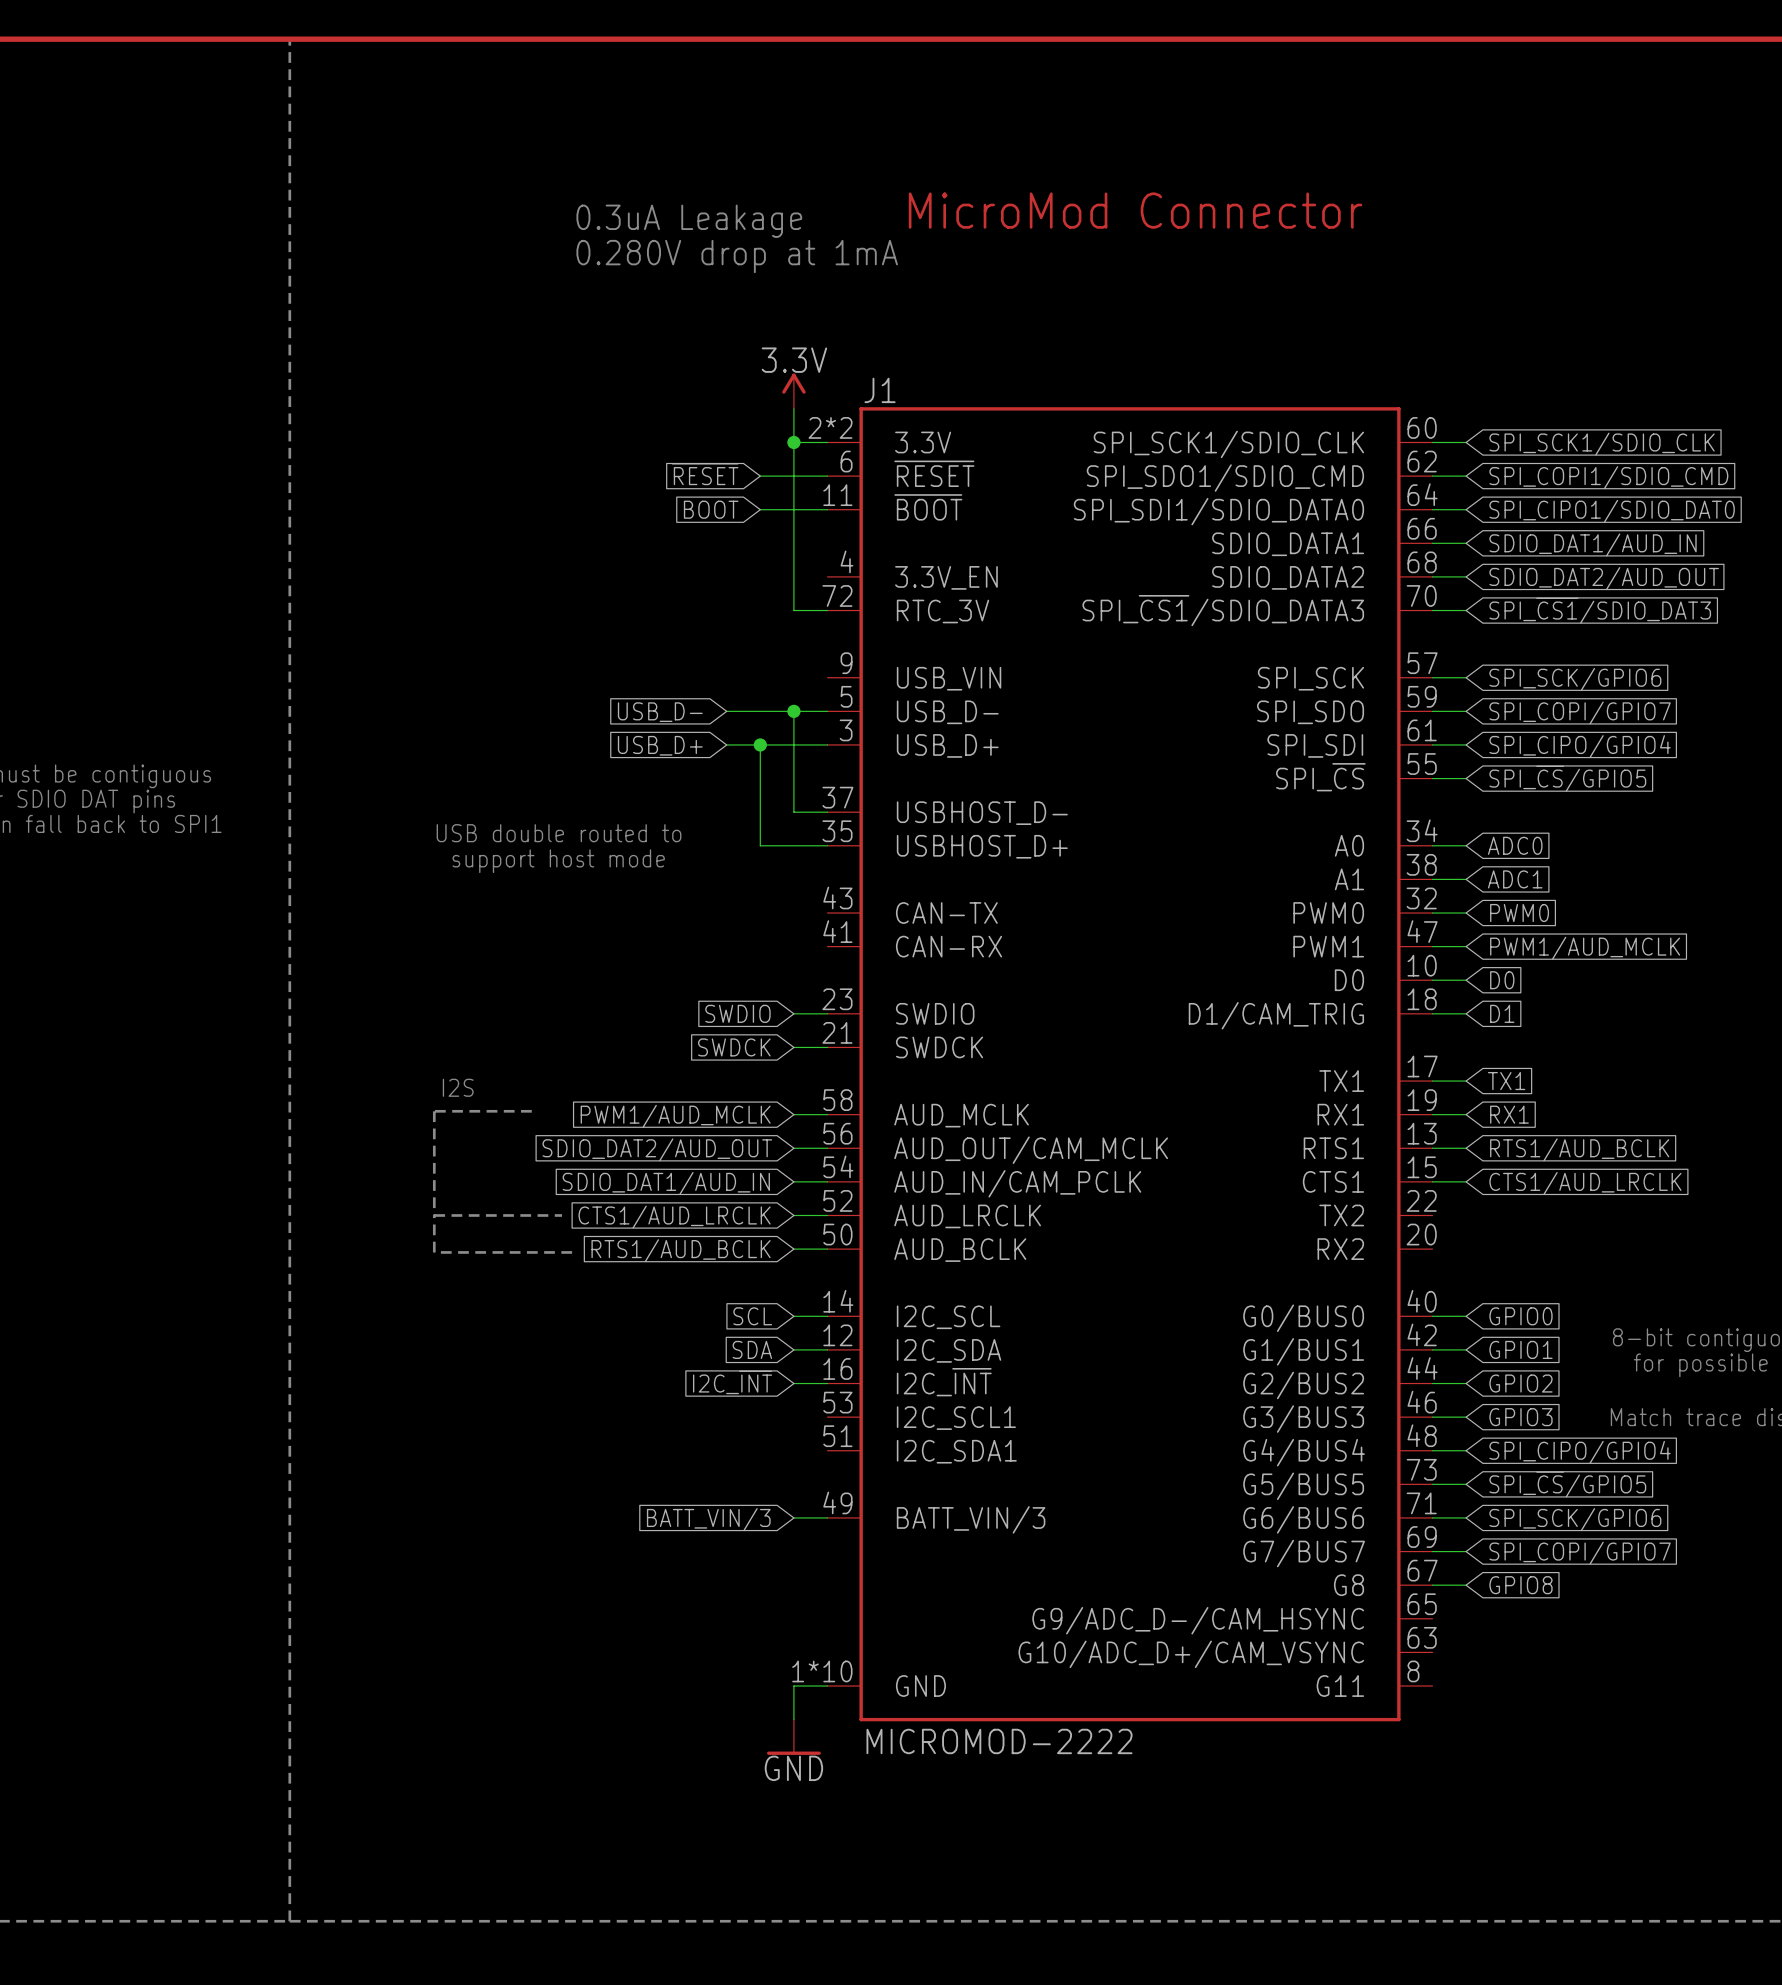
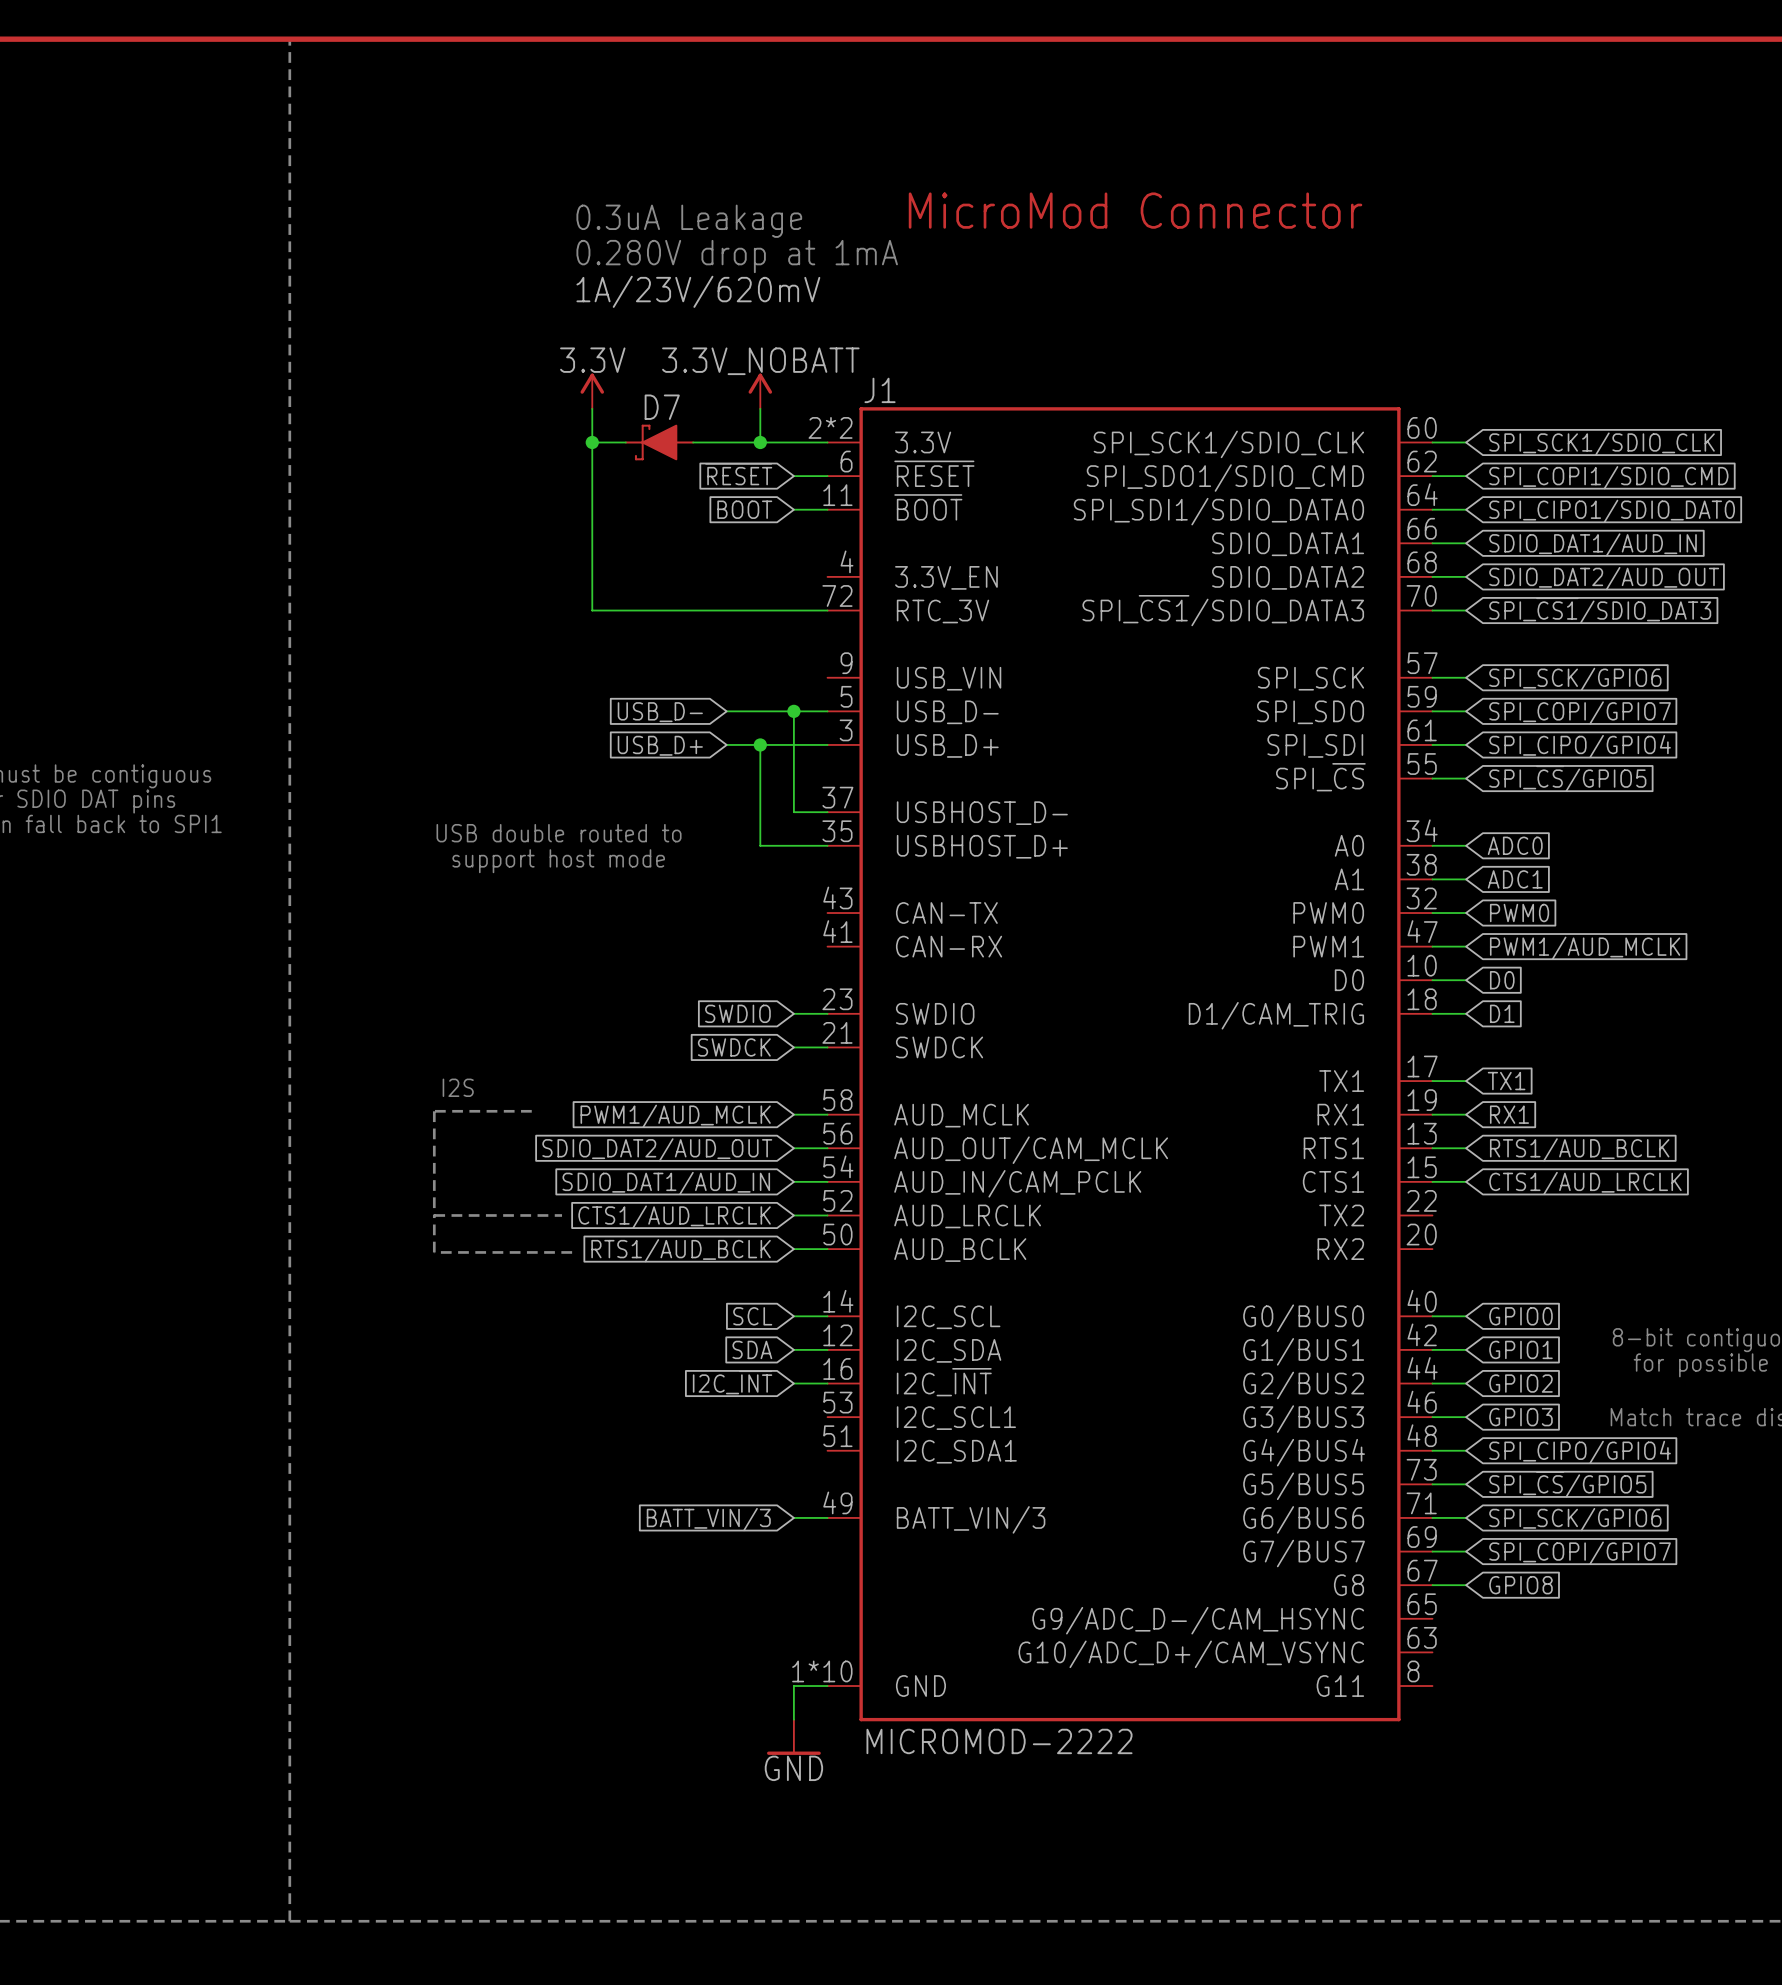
power symbol: none -> 3.3V_NOBATT (760, 391)
power symbol position: 3.3V (793, 391) -> 3.3V (592, 391)
wire: none -> (760, 408) (760, 442)
wire: (793, 408) (793, 610) -> (592, 408) (592, 610) (793, 610)
junction: none -> (592, 442)
D7: none -> 1A/23V/620mV (659, 442)
wire: none -> (693, 442) (793, 442)
junction position: (793, 442) -> (760, 442)
global label position: ~{RESET} (705, 474) -> ~{RESET} (738, 474)
wire: (760, 476) (793, 476) -> (592, 442) (625, 442)
global label position: BOOT (711, 509) -> BOOT (744, 509)
wire: (760, 509) (793, 509) -> none

